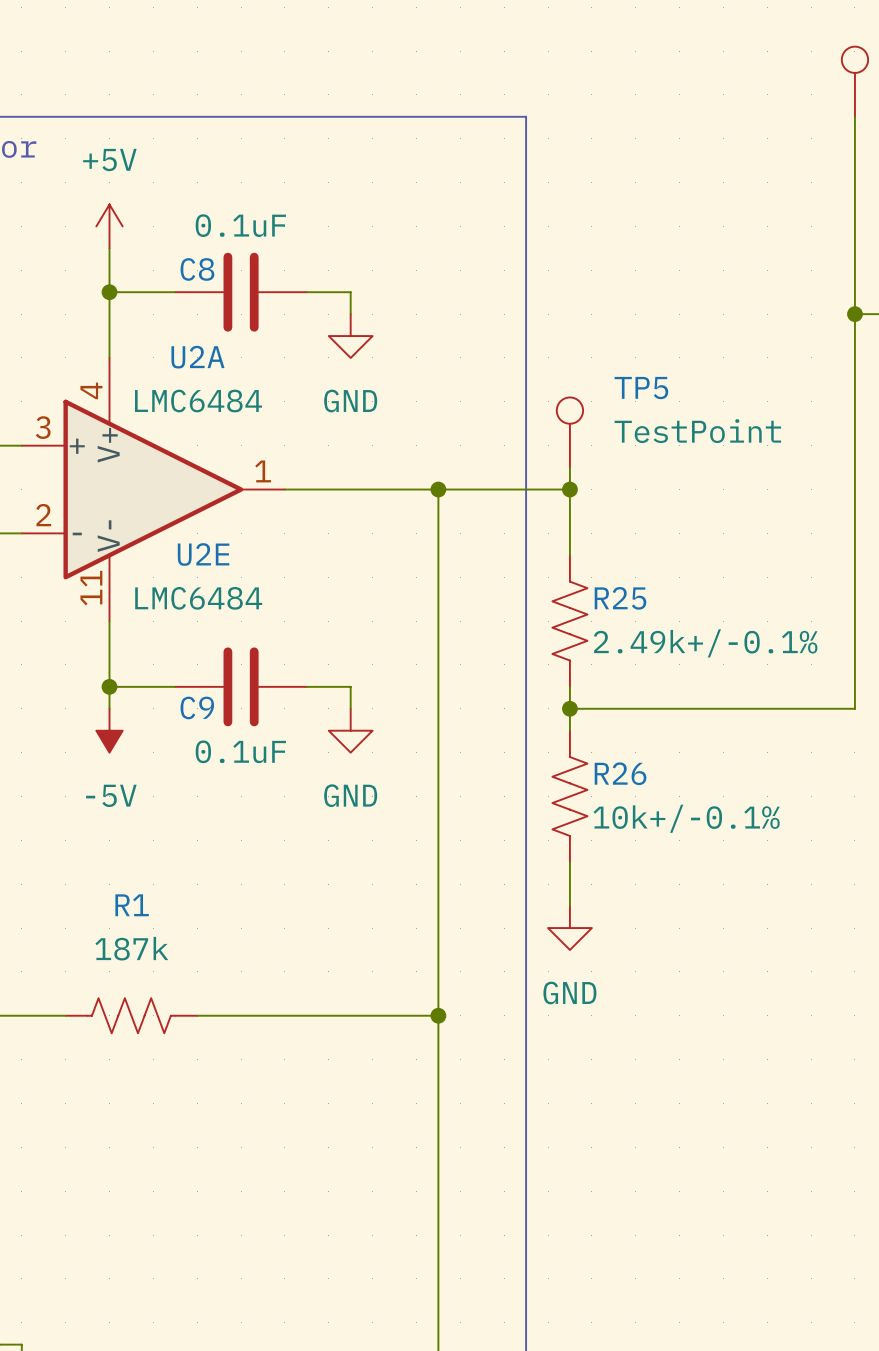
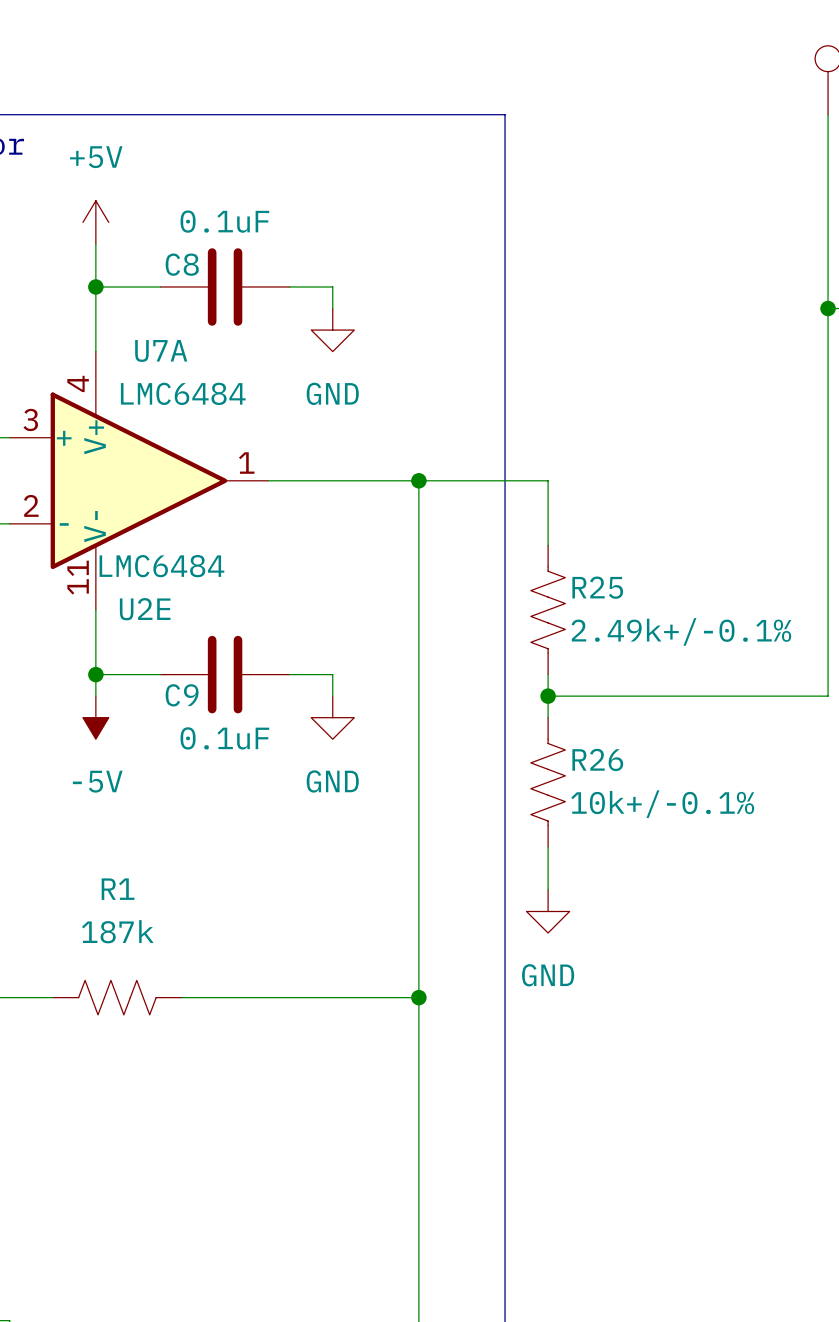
U2A name: U2A (197, 357) -> U7A (161, 350)
TP5: TestPoint (569, 432) -> none
wire: (569, 467) (569, 489) -> none
junction: (569, 489) -> none
U2E name position: U2E (203, 554) -> U2E (145, 609)
U2E value position: LMC6484 (198, 598) -> LMC6484 (161, 566)

